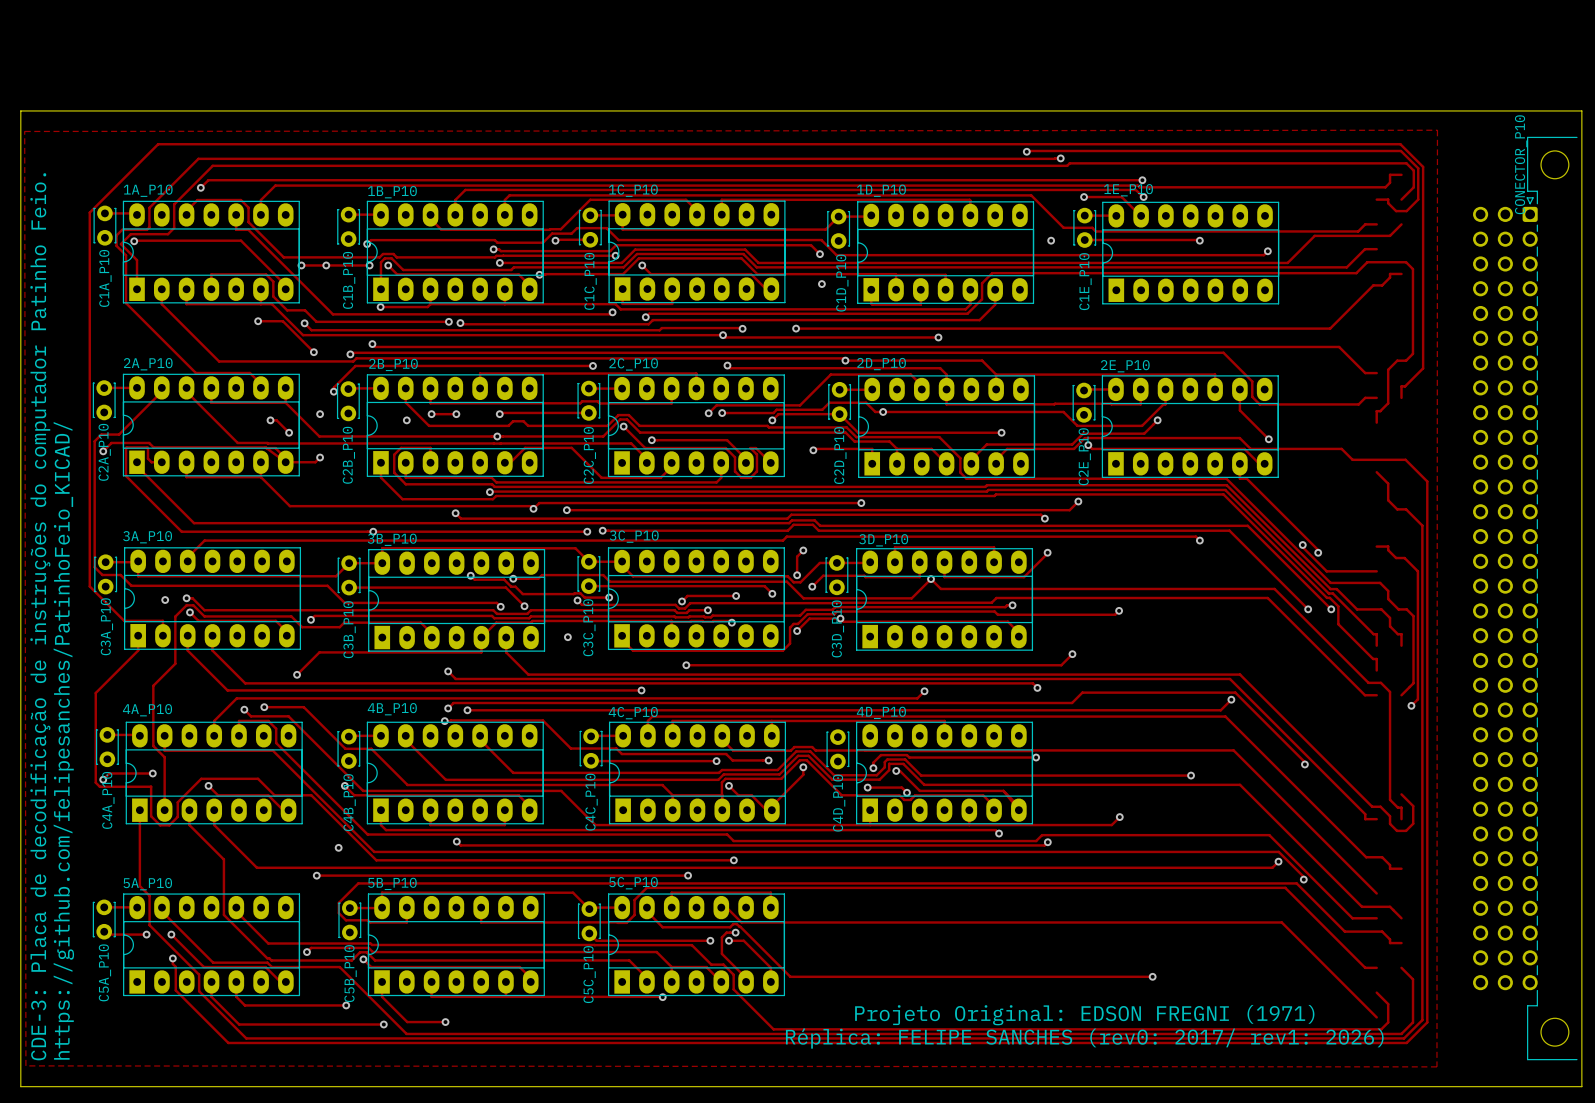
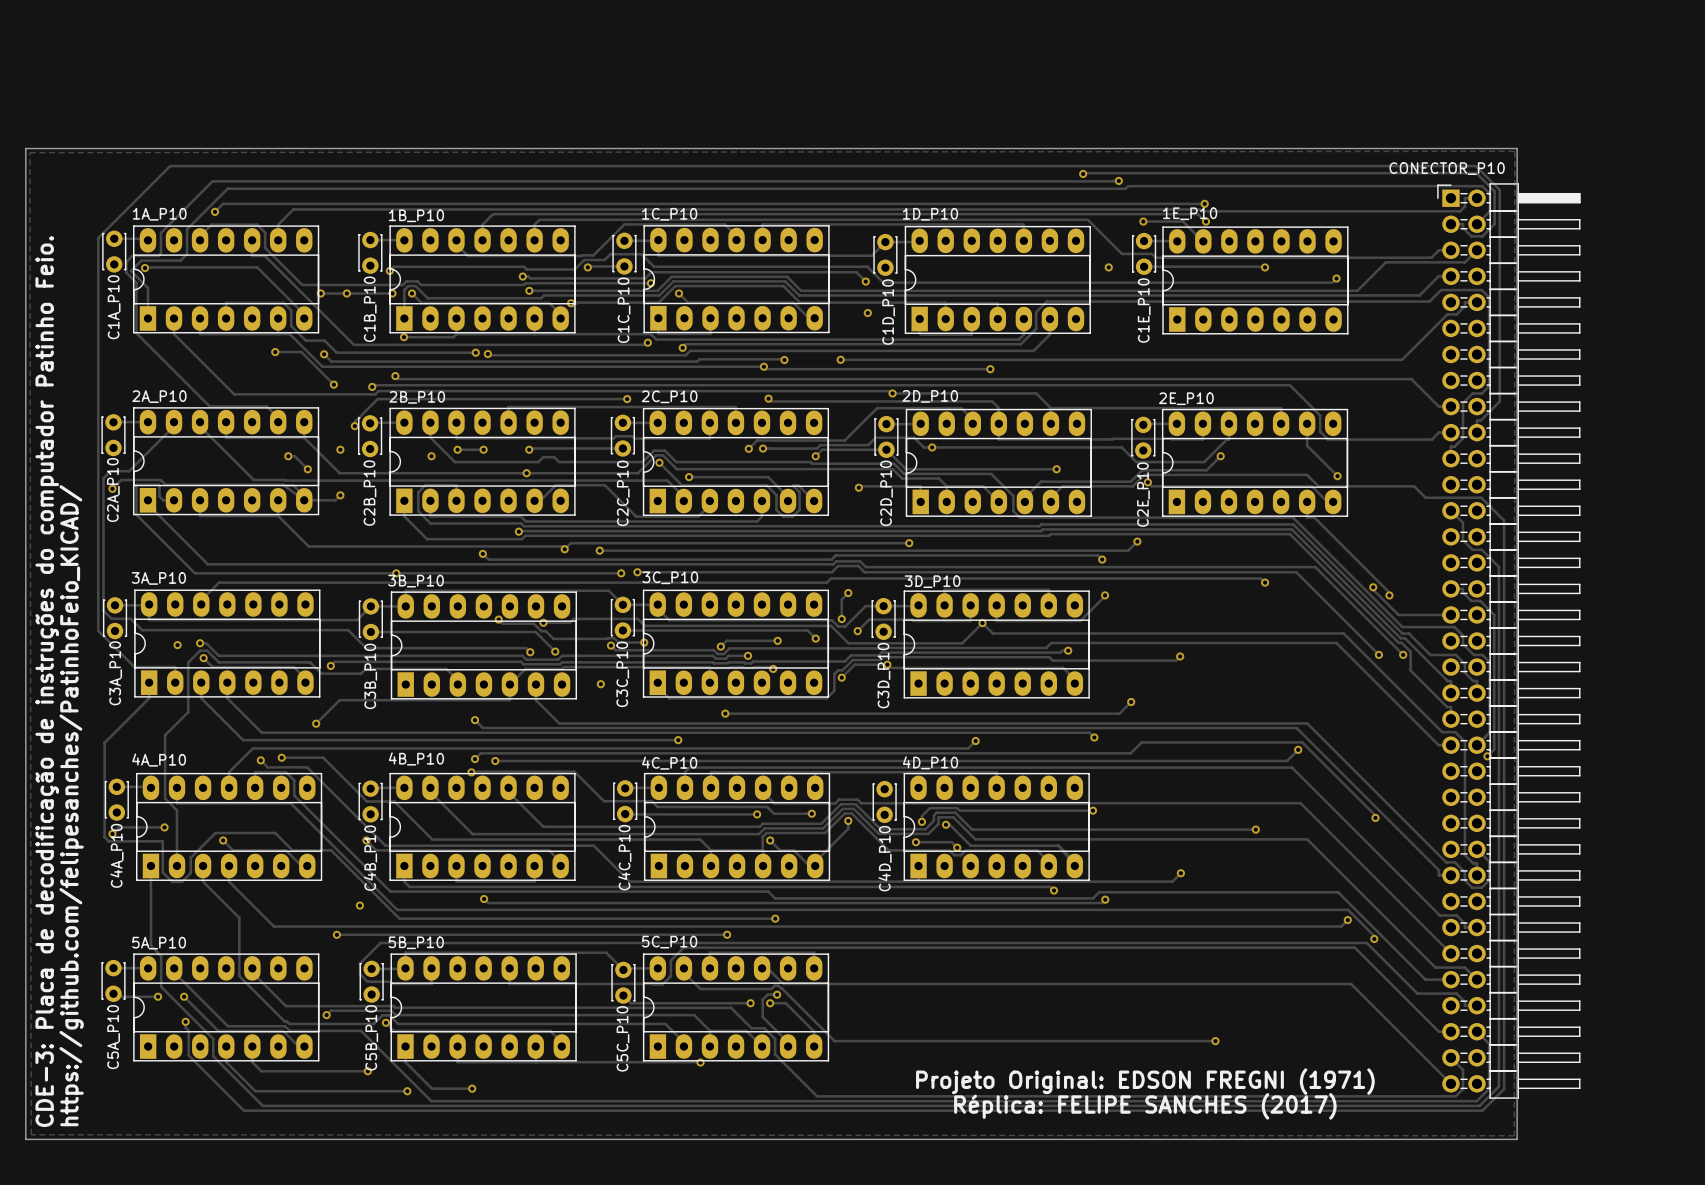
board edge: (20, 127) (20, 110) (1581, 110) (1581, 1086) (20, 1086) (20, 1070) -> (25, 148) (1517, 148) (1517, 1139) (25, 1139)
CONECTOR_P10 footprint: [1473, 136, 1578, 1061] -> [1437, 183, 1581, 1099]
CONECTOR_P10 name position: CONECTOR_P10 (1521, 164) -> CONECTOR_P10 (1447, 168)
text: Réplica: FELIPE SANCHES (rev0: 2017/ rev1: 2026) (1084, 1038) -> Réplica: FELIPE SANCHES (2017) (1145, 1106)

